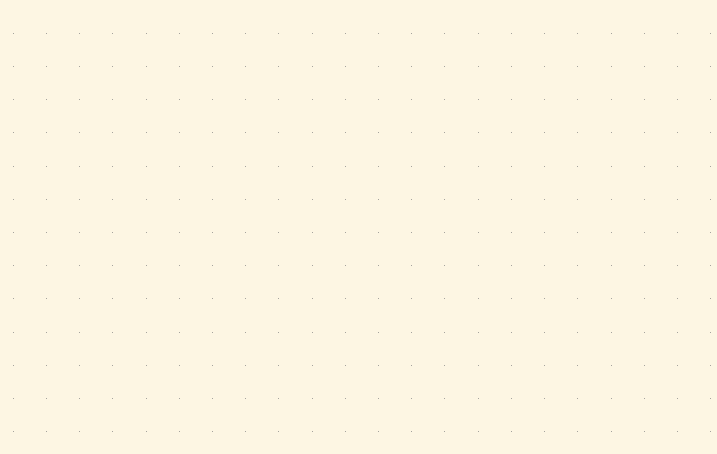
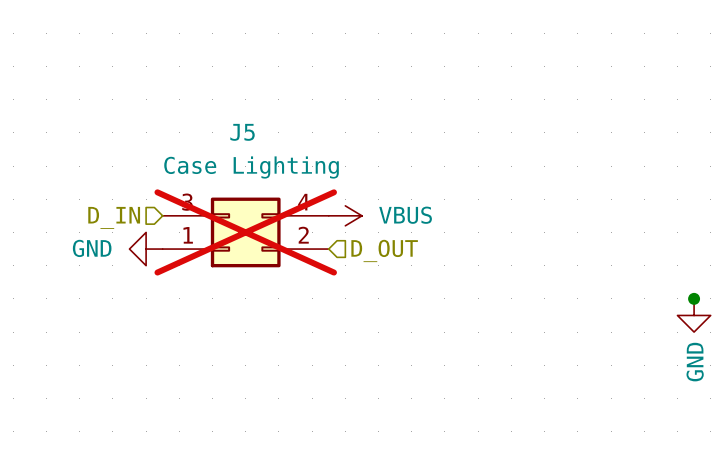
power symbol: none -> VBUS (345, 215)
hierarchical label: none -> D_IN (114, 217)
J5: none -> Case Lighting (245, 232)
power symbol: none -> GND (146, 249)
hierarchical label: none -> D_OUT (384, 250)
junction: none -> (694, 298)
power symbol: none -> GND (694, 315)

